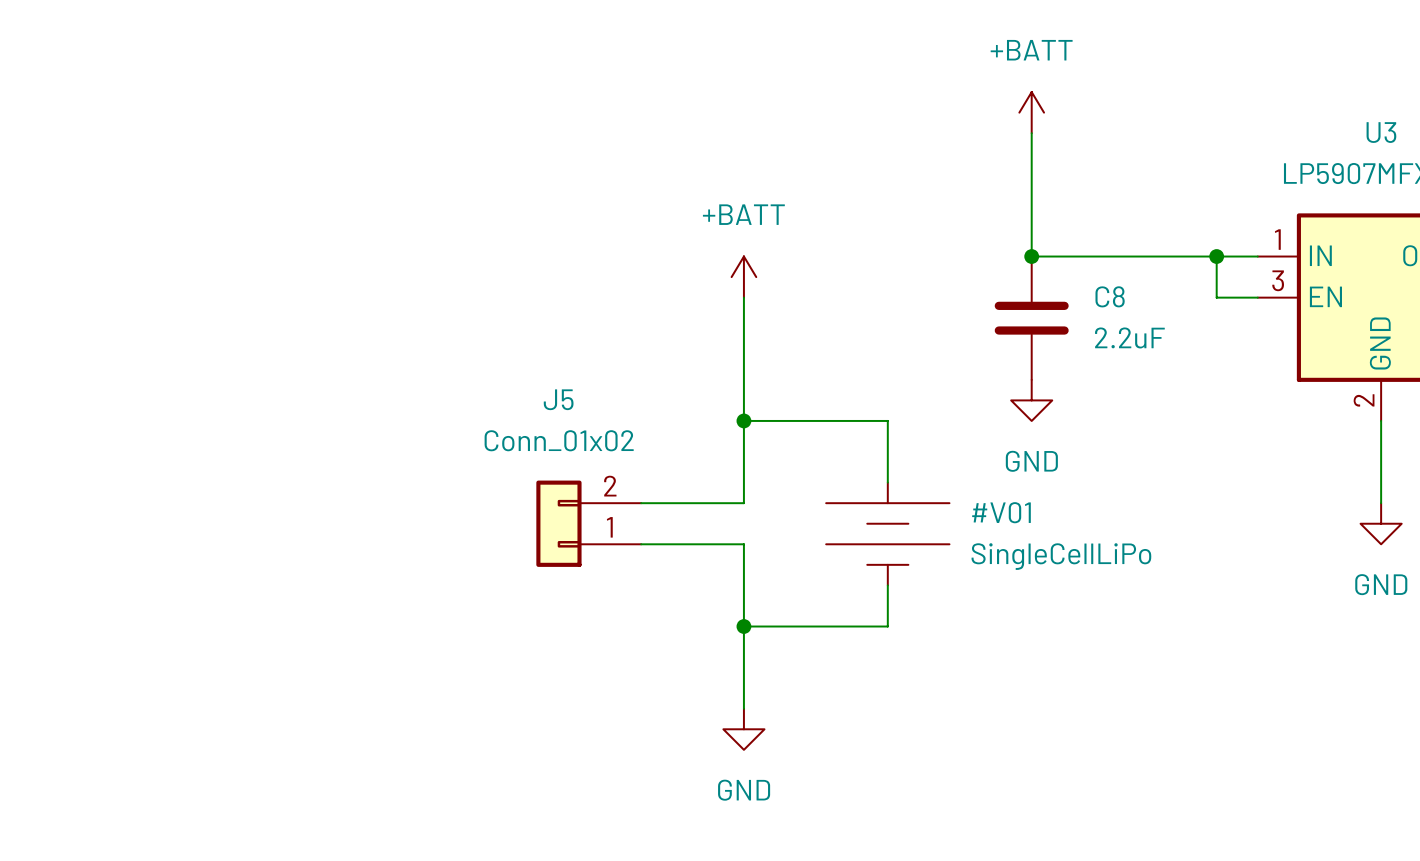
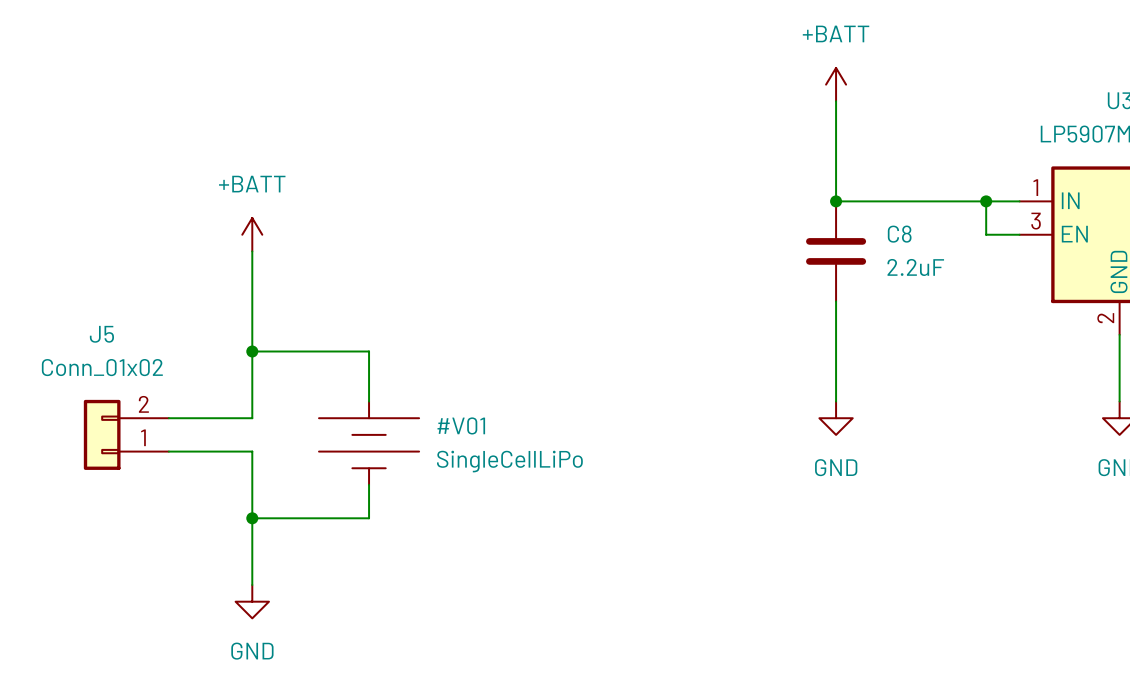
power symbol: +BATT (743, 277) -> none
power symbol: none -> +BATT (252, 234)
wire: (743, 297) (743, 503) (641, 503) -> none
wire: none -> (252, 251) (252, 418) (168, 418)
wire: none -> (836, 301) (836, 401)
power symbol position: GND (1031, 400) -> GND (836, 418)
wire: (743, 420) (887, 420) (887, 482) -> none
junction: (743, 420) -> none
wire: none -> (252, 351) (369, 351) (369, 401)
junction: none -> (252, 351)
J5 position: (588, 523) -> (126, 434)
#V01 position: SingleCellLiPo (887, 534) -> SingleCellLiPo (369, 443)
wire: (641, 544) (743, 544) (743, 708) -> none
wire: none -> (168, 451) (252, 451) (252, 585)
wire: (887, 585) (887, 626) (743, 626) -> none
wire: none -> (369, 484) (369, 518) (252, 518)
junction: (743, 626) -> none
junction: none -> (252, 518)
power symbol: GND (743, 729) -> none
power symbol: none -> GND (252, 601)

